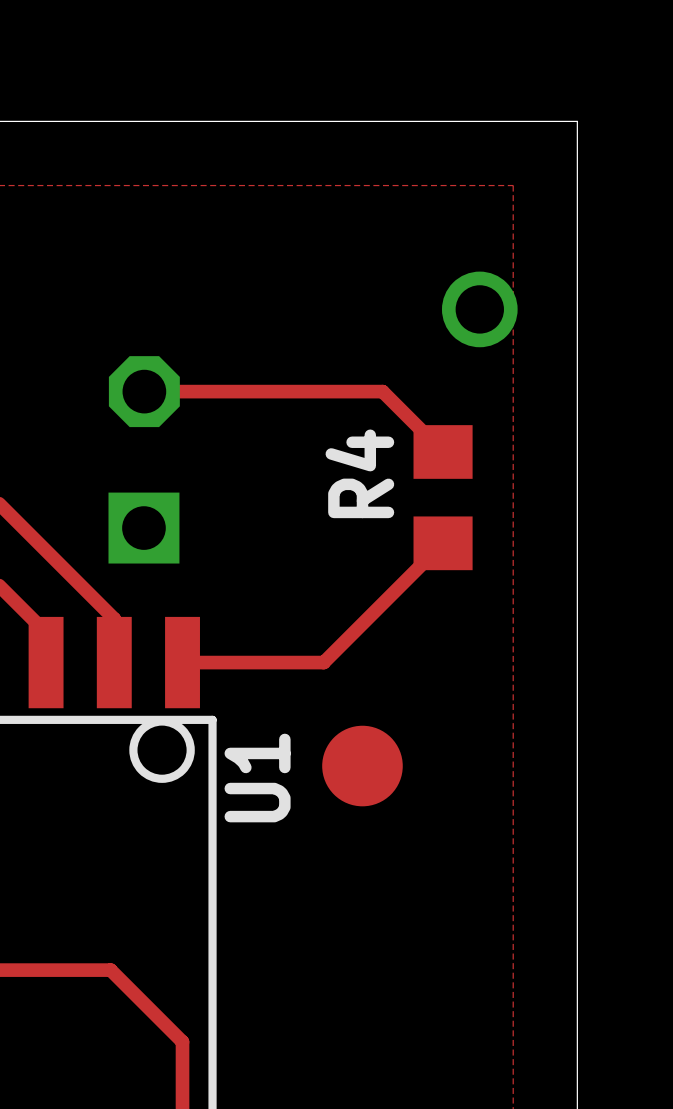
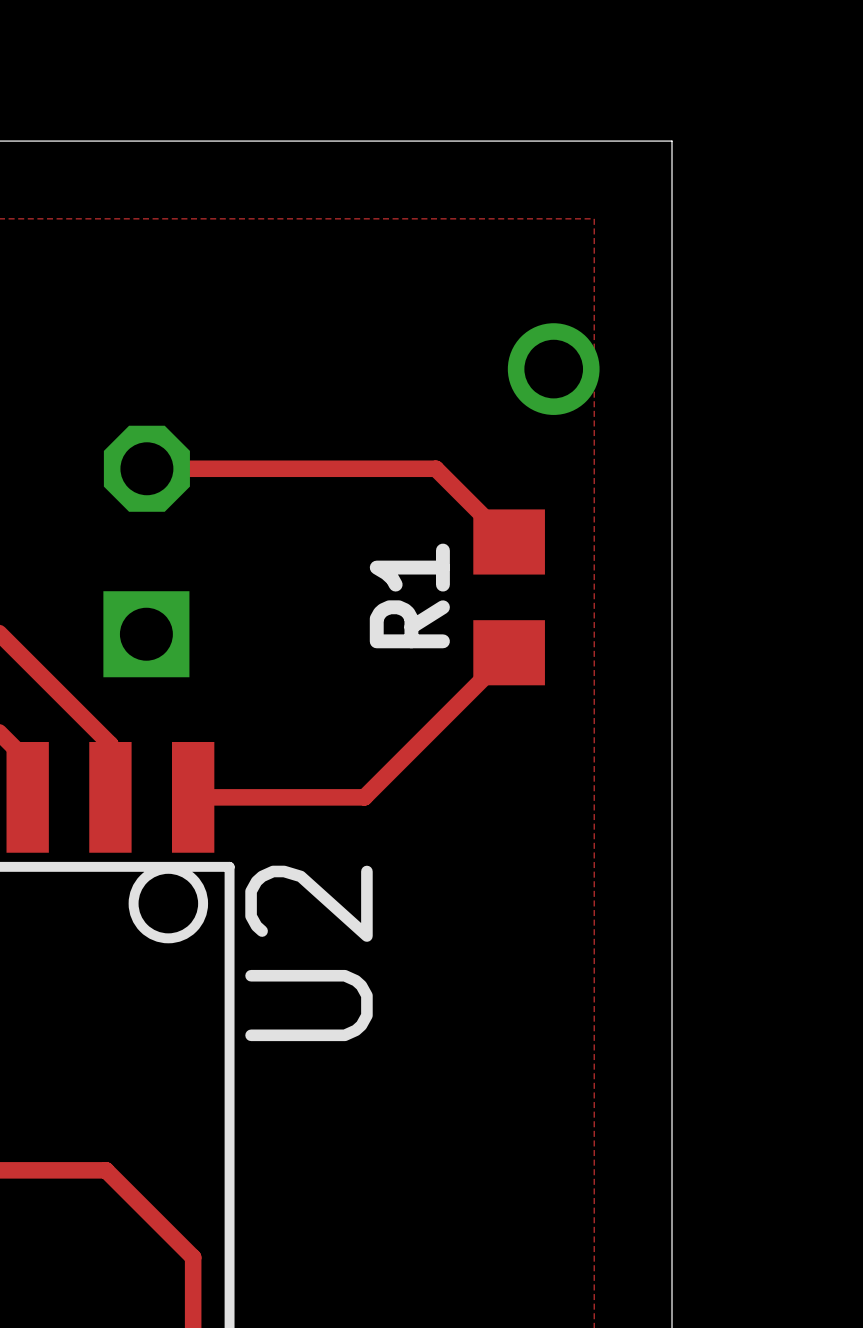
R4 name: R4 (359, 473) -> R1 (409, 595)
part: (362, 766) -> none
U1 name: U1 (257, 778) -> U2 (309, 953)

